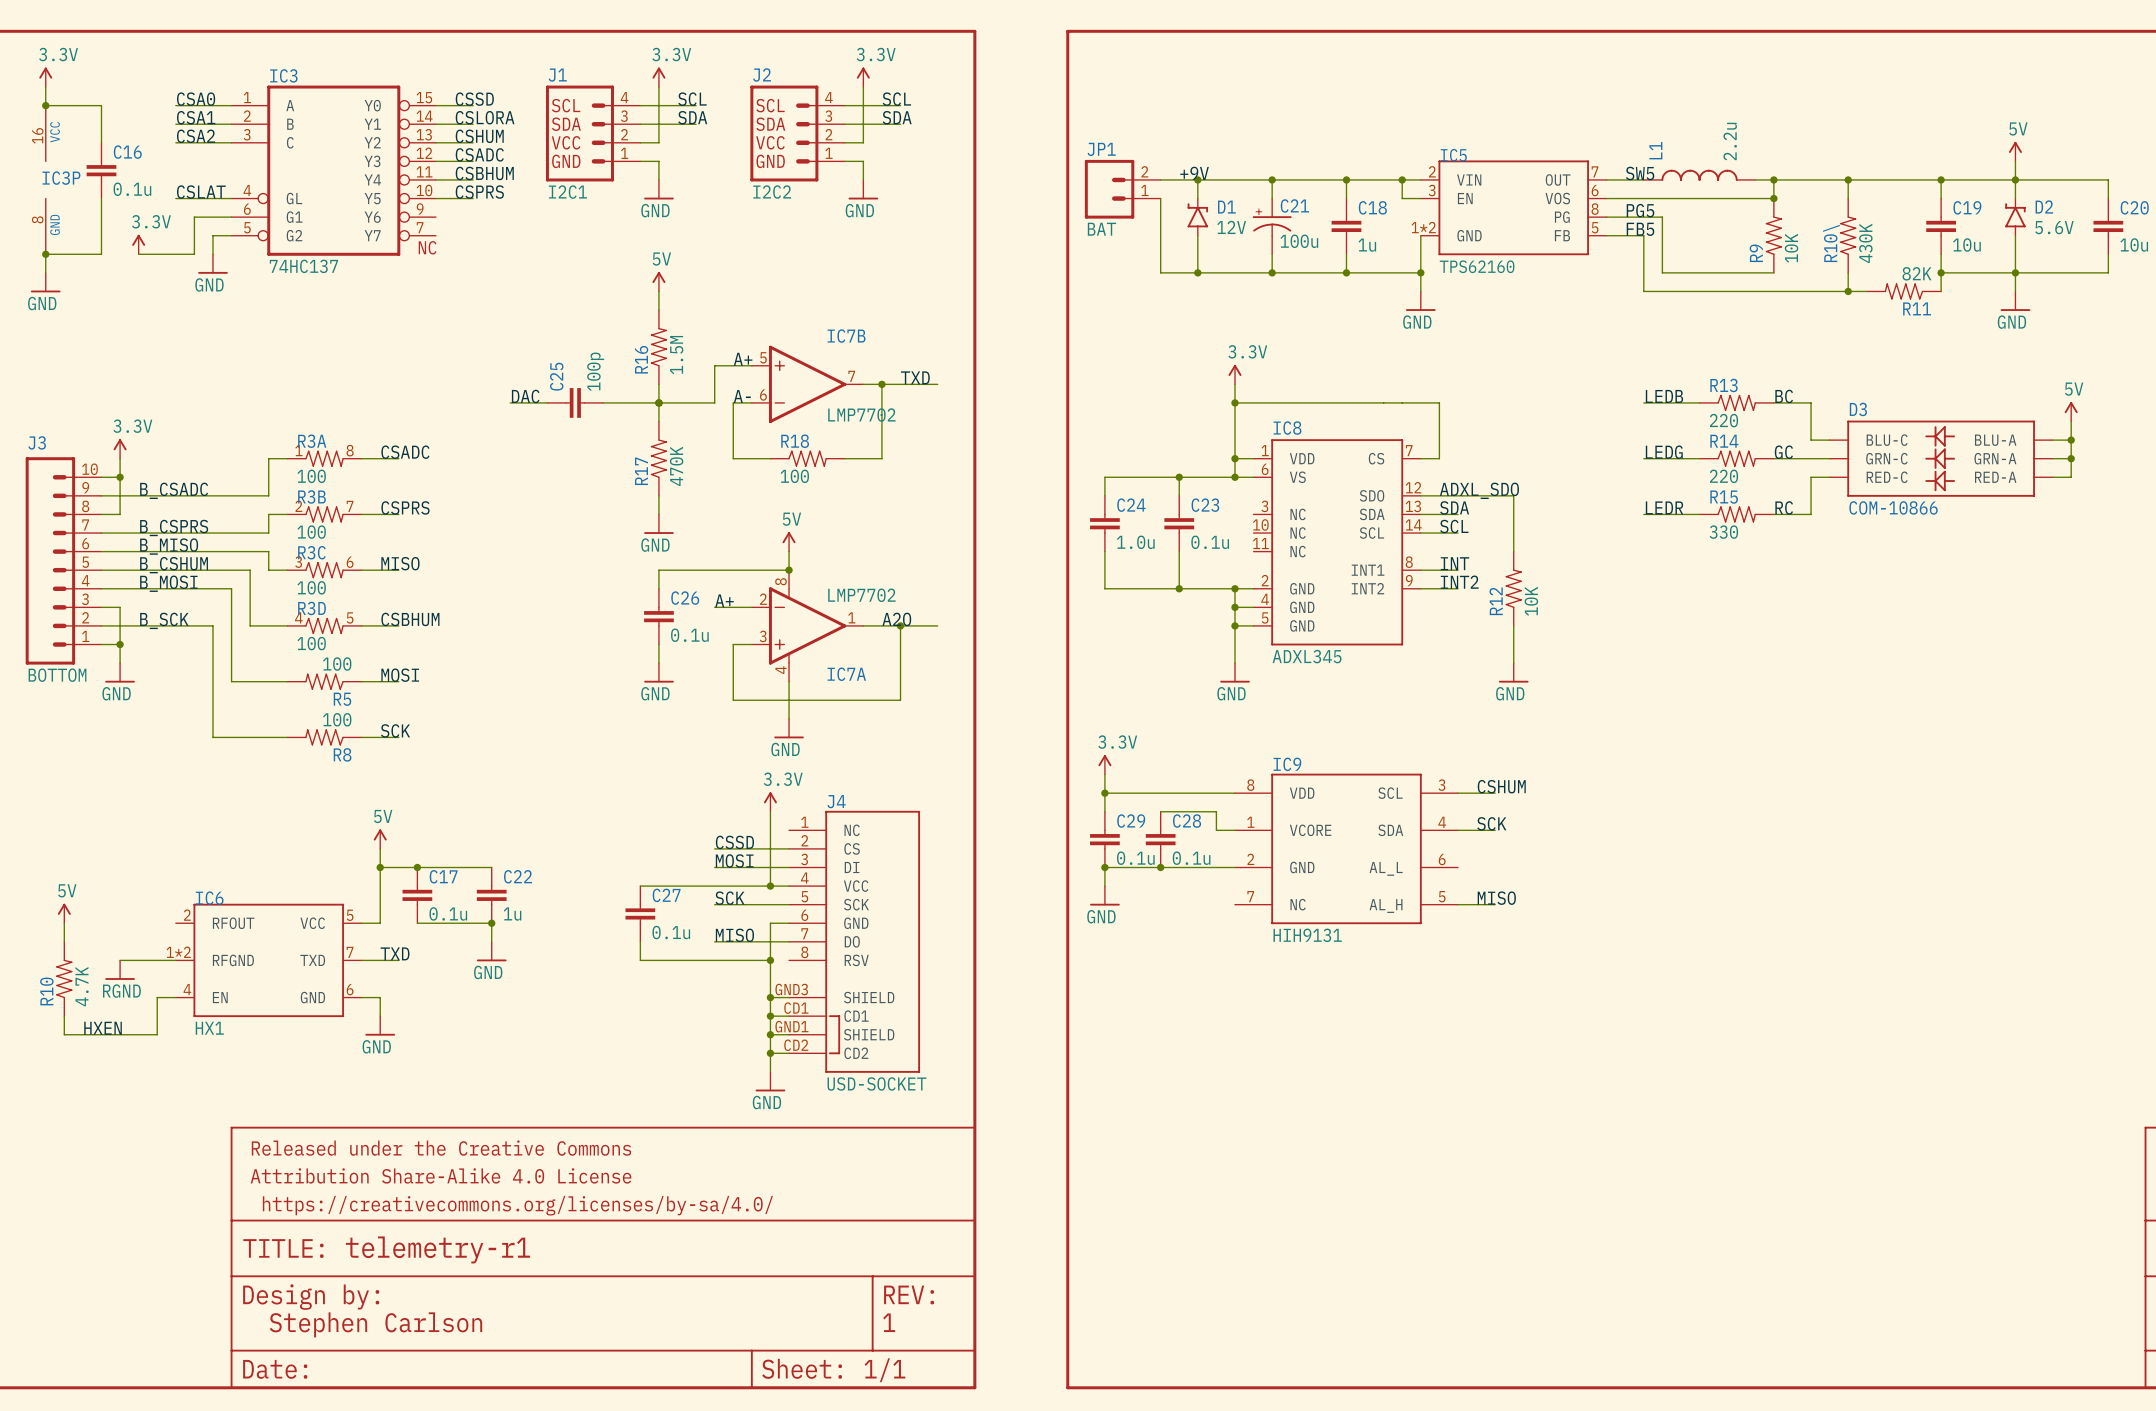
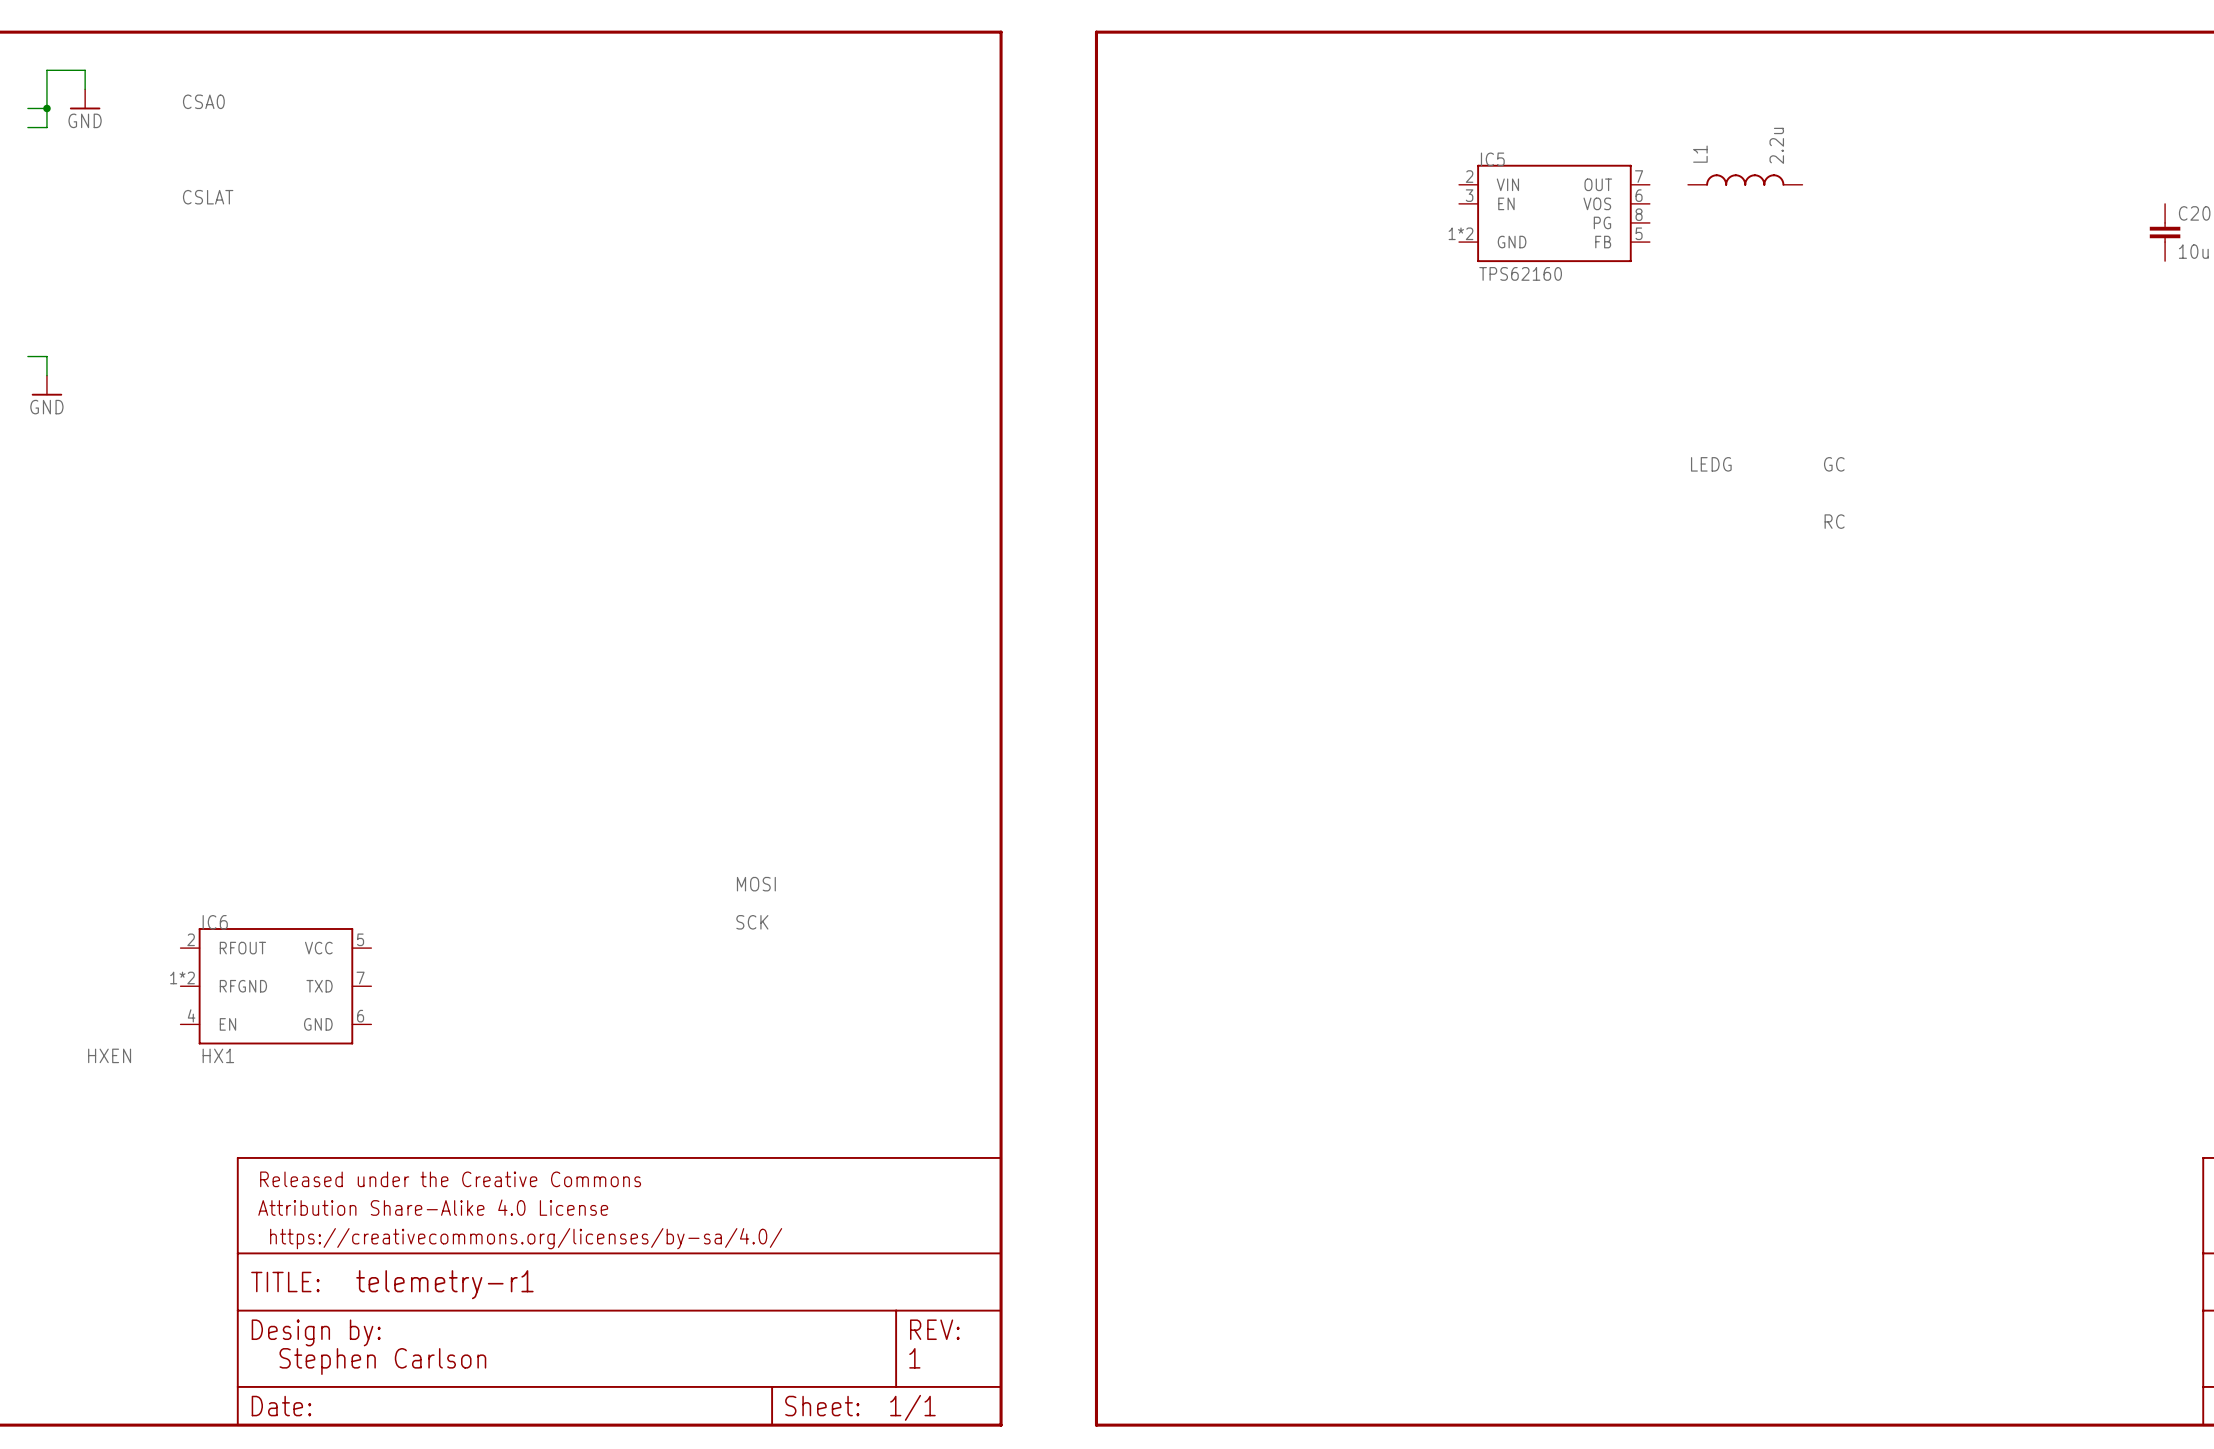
power symbol: 3.3V (45, 77) -> none
power symbol: 3.3V (658, 77) -> none
power symbol: 3.3V (863, 77) -> none
wire: none -> (46, 89) (46, 70) (85, 70) (85, 89)
wire: (658, 87) (658, 142) (640, 142) -> none
wire: (863, 87) (863, 142) (844, 142) -> none
power symbol: none -> GND (85, 99)
label: CSSD (474, 99) -> none
label: SCL (692, 99) -> none
label: SCL (896, 99) -> none
wire: none -> (27, 108) (46, 108) (46, 127) (27, 127)
wire: (45, 105) (101, 105) (101, 142) -> none
wire: (175, 105) (231, 105) -> none
wire: (435, 105) (473, 105) -> none
wire: (640, 105) (696, 105) -> none
wire: (844, 105) (900, 105) -> none
label: CSA1 (196, 117) -> none
label: CSLORA (485, 117) -> none
label: SDA (692, 117) -> none
label: SDA (897, 117) -> none
wire: (175, 124) (231, 124) -> none
wire: (435, 124) (473, 124) -> none
wire: (640, 124) (696, 124) -> none
wire: (844, 124) (900, 124) -> none
J1: I2C1 (593, 133) -> none
J2: I2C2 (797, 133) -> none
label: CSA2 (196, 136) -> none
label: CSHUM (479, 136) -> none
wire: (175, 142) (231, 142) -> none
wire: (435, 142) (473, 142) -> none
power symbol: 5V (2015, 151) -> none
label: CSADC (479, 154) -> none
wire: (435, 161) (473, 161) -> none
wire: (640, 161) (658, 161) (658, 179) -> none
wire: (844, 161) (863, 161) (863, 179) -> none
wire: (2015, 161) (2015, 198) -> none
C16: 0.1u (101, 170) -> none
IC3: 74HC137 (333, 170) -> none
label: CSBHUM (484, 173) -> none
label: +9V (1194, 173) -> none
label: SW5 (1640, 173) -> none
IC3P: (45, 179) -> none
wire: (435, 179) (473, 179) -> none
wire: (1160, 179) (1420, 179) -> none
wire: (1197, 179) (1197, 198) -> none
junction: (1197, 179) -> none
wire: (1272, 179) (1272, 198) -> none
junction: (1272, 179) -> none
wire: (1346, 179) (1346, 198) -> none
junction: (1346, 179) -> none
wire: (1402, 179) (1402, 198) (1420, 198) -> none
junction: (1402, 179) -> none
wire: (1606, 179) (1643, 179) -> none
wire: (1755, 179) (2108, 179) (2108, 198) -> none
wire: (1773, 179) (1773, 198) (1606, 198) -> none
junction: (1773, 179) -> none
wire: (1848, 179) (1848, 198) -> none
junction: (1848, 179) -> none
wire: (1941, 179) (1941, 198) -> none
junction: (1941, 179) -> none
junction: (2015, 179) -> none
power symbol: GND (658, 189) -> none
power symbol: GND (863, 189) -> none
JP1: BAT (1122, 189) -> none
label: CSPRS (479, 192) -> none
wire: (101, 198) (101, 254) (45, 254) (45, 272) -> none
wire: (175, 198) (231, 198) -> none
wire: (435, 198) (473, 198) -> none
wire: (1160, 198) (1160, 272) (1420, 272) -> none
junction: (1773, 198) -> none
label: PG5 (1640, 210) -> none
wire: (231, 217) (194, 217) (194, 254) (138, 254) -> none
D1: 12V (1197, 217) -> none
wire: (1606, 217) (1662, 217) (1662, 272) (1773, 272) -> none
D2: 5.6V (2015, 217) -> none
C21: 100u (1272, 226) -> none
C18: 1u (1346, 226) -> none
C19: 10u (1941, 226) -> none
label: FB5 (1640, 229) -> none
wire: (231, 235) (212, 235) (212, 254) -> none
wire: (1197, 235) (1197, 272) -> none
wire: (1420, 235) (1420, 291) -> none
wire: (1606, 235) (1643, 235) (1643, 291) (1866, 291) -> none
R9: 10K (1773, 235) -> none
R10\: 430K (1848, 235) -> none
wire: (2015, 235) (2015, 291) -> none
power symbol: 3.3V (138, 244) -> none
text: NC (427, 247) -> none
junction: (45, 254) -> none
wire: (1272, 254) (1272, 272) -> none
wire: (1346, 254) (1346, 272) -> none
wire: (1941, 254) (1941, 291) -> none
wire: (2108, 254) (2108, 272) (1941, 272) -> none
power symbol: GND (212, 264) -> none
junction: (1197, 272) -> none
junction: (1272, 272) -> none
junction: (1346, 272) -> none
junction: (1420, 272) -> none
wire: (1848, 272) (1848, 291) -> none
junction: (1941, 272) -> none
junction: (2015, 272) -> none
power symbol: 5V (658, 281) -> none
power symbol position: GND (45, 282) -> GND (46, 385)
wire: (658, 291) (658, 310) -> none
junction: (1848, 291) -> none
R11: 82K (1903, 291) -> none
power symbol: GND (1420, 301) -> none
power symbol: GND (2015, 301) -> none
wire: none -> (27, 356) (46, 356) (46, 375)
R16: 1.5M (658, 347) -> none
label: A+ (743, 359) -> none
wire: (751, 365) (714, 365) (714, 402) (603, 402) -> none
power symbol: 3.3V (1234, 374) -> none
label: TXD (915, 377) -> none
wire: (658, 384) (658, 421) -> none
IC7B: LMP7702 (807, 384) -> none
wire: (863, 384) (937, 384) -> none
wire: (881, 384) (881, 458) (844, 458) -> none
junction: (881, 384) -> none
wire: (1234, 384) (1234, 477) -> none
label: DAC (525, 396) -> none
label: A- (742, 396) -> none
label: LEDB (1664, 396) -> none
label: BC (1784, 396) -> none
wire: (510, 402) (547, 402) -> none
C25: 100p (575, 402) -> none
junction: (658, 402) -> none
wire: (751, 402) (733, 402) (733, 458) (770, 458) -> none
wire: (1234, 402) (1439, 402) (1439, 458) (1420, 458) -> none
junction: (1234, 402) -> none
wire: (1643, 402) (1699, 402) -> none
R13: 220 (1736, 402) -> none
wire: (1773, 402) (1811, 402) (1811, 440) (1829, 440) -> none
power symbol: 5V (2071, 411) -> none
wire: (2071, 421) (2071, 477) (2052, 477) -> none
wire: (2052, 440) (2071, 440) -> none
junction: (2071, 440) -> none
power symbol: 3.3V (120, 448) -> none
label: CSADC (405, 452) -> none
wire: (120, 458) (120, 514) (101, 514) -> none
wire: (287, 458) (268, 458) (268, 495) (101, 495) -> none
R3A: 100 (324, 458) -> none
wire: (361, 458) (398, 458) -> none
R17: 470K (658, 458) -> none
R18: 100 (807, 458) -> none
wire: (1234, 458) (1253, 458) -> none
junction: (1234, 458) -> none
wire: (1643, 458) (1699, 458) -> none
R14: 220 (1736, 458) -> none
wire: (1773, 458) (1829, 458) -> none
D3: COM-10866 (1941, 458) -> none
wire: (2052, 458) (2071, 458) -> none
junction: (2071, 458) -> none
wire: (101, 477) (120, 477) -> none
junction: (120, 477) -> none
wire: (1179, 477) (1179, 495) -> none
junction: (1179, 477) -> none
junction: (1234, 477) -> none
wire: (1253, 477) (1104, 477) (1104, 495) -> none
wire: (1829, 477) (1811, 477) (1811, 514) (1773, 514) -> none
label: B_CSADC (174, 490) -> none
label: ADXL_SDO (1479, 490) -> none
wire: (658, 495) (658, 514) -> none
wire: (1420, 495) (1513, 495) (1513, 551) -> none
label: CSPRS (405, 507) -> none
label: SDA (1454, 507) -> none
label: LEDR (1664, 507) -> none
wire: (287, 514) (268, 514) (268, 533) (101, 533) -> none
R3B: 100 (324, 514) -> none
wire: (361, 514) (398, 514) -> none
wire: (1420, 514) (1457, 514) -> none
wire: (1643, 514) (1699, 514) -> none
R15: 330 (1736, 514) -> none
C24: 1.0u (1104, 523) -> none
C23: 0.1u (1179, 523) -> none
power symbol: GND (658, 524) -> none
label: SCL (1454, 526) -> none
label: B_CSPRS (174, 527) -> none
wire: (1420, 533) (1457, 533) -> none
power symbol: 5V (789, 541) -> none
IC8: ADXL345 (1337, 542) -> none
label: B_MISO (169, 546) -> none
wire: (101, 551) (268, 551) (268, 570) (287, 570) -> none
wire: (789, 551) (789, 570) (658, 570) (658, 588) -> none
wire: (1104, 551) (1104, 588) (1253, 588) -> none
wire: (1179, 551) (1179, 588) -> none
J3: BOTTOM (63, 560) -> none
label: MISO (400, 563) -> none
label: INT (1454, 563) -> none
label: B_CSHUM (174, 565) -> none
wire: (101, 570) (250, 570) (250, 625) (287, 625) -> none
R3C: 100 (324, 570) -> none
wire: (361, 570) (398, 570) -> none
junction: (789, 570) -> none
wire: (1420, 570) (1457, 570) -> none
label: INT2 (1459, 582) -> none
label: B_MOSI (168, 583) -> none
wire: (101, 588) (231, 588) (231, 681) (287, 681) -> none
junction: (1179, 588) -> none
wire: (1234, 588) (1234, 663) -> none
junction: (1234, 588) -> none
wire: (1420, 588) (1457, 588) -> none
R12: 10K (1513, 588) -> none
label: A+ (724, 600) -> none
wire: (101, 607) (120, 607) (120, 663) -> none
wire: (714, 607) (751, 607) -> none
wire: (1234, 607) (1253, 607) -> none
junction: (1234, 607) -> none
C26: 0.1u (658, 616) -> none
label: CSBHUM (410, 619) -> none
label: A2O (896, 619) -> none
label: B_SCK (164, 620) -> none
wire: (101, 625) (212, 625) (212, 737) (287, 737) -> none
R3D: 100 (324, 625) -> none
wire: (361, 625) (398, 625) -> none
IC7A: LMP7702 (807, 625) -> none
wire: (863, 625) (937, 625) -> none
wire: (900, 625) (900, 700) (733, 700) (733, 644) (751, 644) -> none
junction: (900, 625) -> none
wire: (1234, 625) (1253, 625) -> none
junction: (1234, 625) -> none
wire: (1513, 625) (1513, 663) -> none
wire: (101, 644) (120, 644) -> none
junction: (120, 644) -> none
wire: (658, 644) (658, 663) -> none
power symbol: GND (120, 672) -> none
power symbol: GND (658, 672) -> none
power symbol: GND (1234, 672) -> none
power symbol: GND (1513, 672) -> none
label: MOSI (400, 675) -> none
R5: 100 (324, 681) -> none
wire: (361, 681) (398, 681) -> none
wire: (789, 681) (789, 718) -> none
power symbol: GND (789, 728) -> none
label: SCK (395, 730) -> none
R8: 100 (324, 737) -> none
wire: (361, 737) (398, 737) -> none
power symbol: 3.3V (1104, 764) -> none
wire: (1104, 774) (1104, 811) -> none
label: CSHUM (1501, 786) -> none
wire: (1104, 793) (1234, 793) -> none
junction: (1104, 793) -> none
wire: (1457, 793) (1495, 793) -> none
power symbol: 3.3V (770, 802) -> none
wire: (770, 811) (770, 886) -> none
wire: (1160, 811) (1216, 811) (1216, 830) (1234, 830) -> none
label: SCK (1491, 823) -> none
wire: (1457, 830) (1495, 830) -> none
power symbol: 5V (380, 839) -> none
C29: 0.1u (1104, 839) -> none
C28: 0.1u (1160, 839) -> none
label: CSSD (734, 842) -> none
wire: (380, 848) (380, 923) (361, 923) -> none
wire: (714, 848) (789, 848) -> none
IC9: HIH9131 (1346, 848) -> none
wire: (380, 867) (491, 867) -> none
junction: (380, 867) -> none
junction: (417, 867) -> none
wire: (714, 867) (789, 867) -> none
junction: (1104, 867) -> none
junction: (1160, 867) -> none
wire: (1234, 867) (1104, 867) (1104, 886) -> none
wire: (640, 886) (789, 886) -> none
junction: (770, 886) -> none
C17: 0.1u (417, 895) -> none
C22: 1u (491, 895) -> none
power symbol: GND (1104, 895) -> none
label: MISO (1496, 898) -> none
wire: (714, 904) (789, 904) -> none
wire: (1457, 904) (1495, 904) -> none
power symbol: 5V (64, 913) -> none
C27: 0.1u (640, 913) -> none
wire: (64, 923) (64, 941) -> none
wire: (417, 923) (491, 923) (491, 941) -> none
junction: (491, 923) -> none
wire: (789, 923) (770, 923) (770, 1071) -> none
label: MISO (734, 935) -> none
wire: (640, 941) (640, 960) (770, 960) -> none
wire: (714, 941) (789, 941) -> none
J4: USD-SOCKET (854, 941) -> none
power symbol: GND (491, 951) -> none
label: TXD (395, 953) -> none
wire: (120, 960) (175, 960) -> none
wire: (361, 960) (398, 960) -> none
junction: (770, 960) -> none
power symbol: RGND (120, 970) -> none
R10: 4.7K (64, 978) -> none
wire: (175, 997) (157, 997) (157, 1034) (64, 1034) (64, 1016) -> none
wire: (361, 997) (380, 997) (380, 1016) -> none
wire: (770, 997) (789, 997) -> none
junction: (770, 997) -> none
wire: (770, 1016) (789, 1016) -> none
junction: (770, 1016) -> none
power symbol: GND (380, 1025) -> none
wire: (770, 1034) (789, 1034) -> none
junction: (770, 1034) -> none
wire: (770, 1053) (789, 1053) -> none
junction: (770, 1053) -> none
power symbol: GND (770, 1081) -> none

